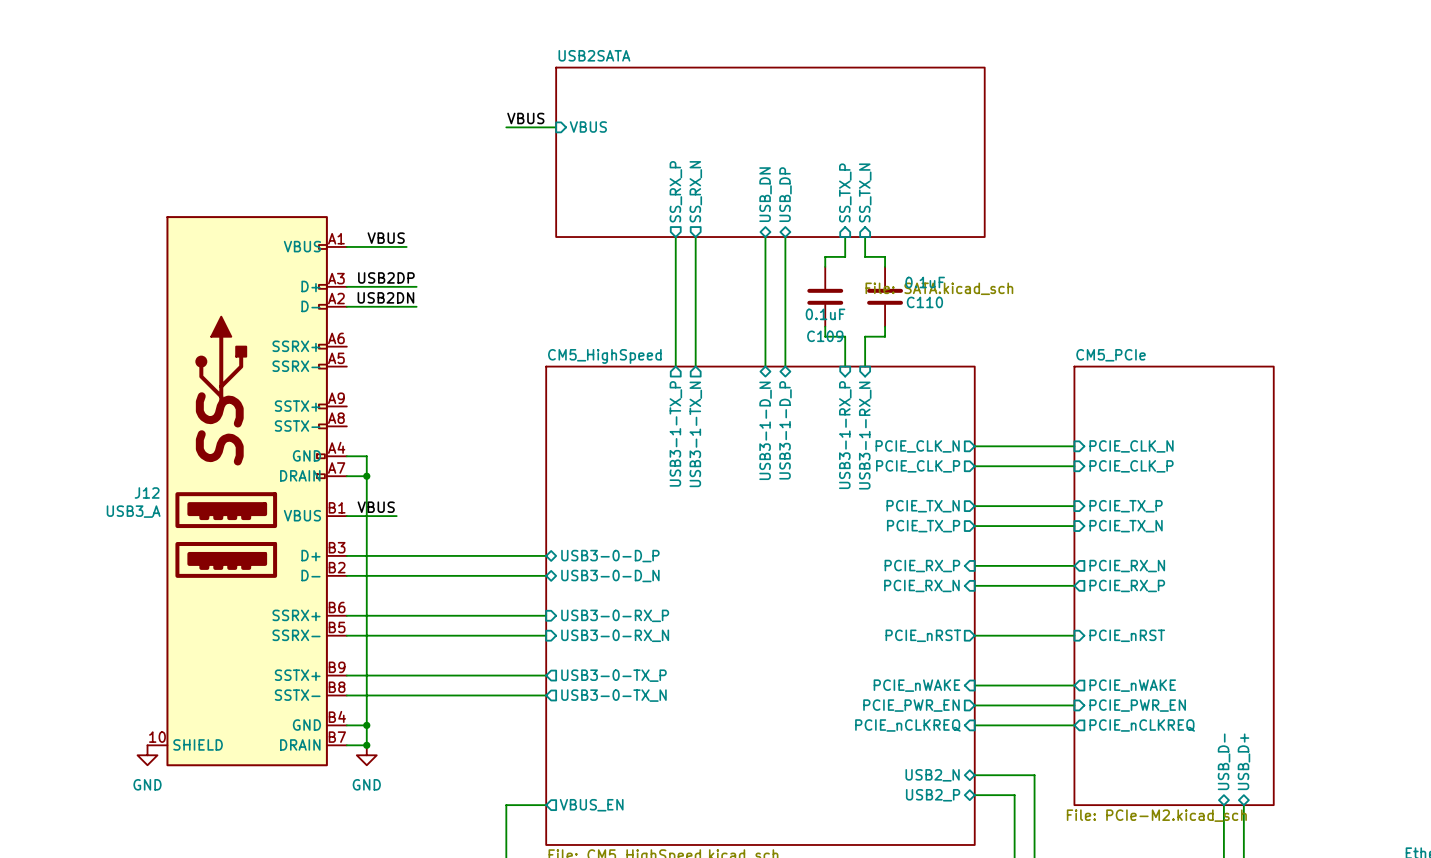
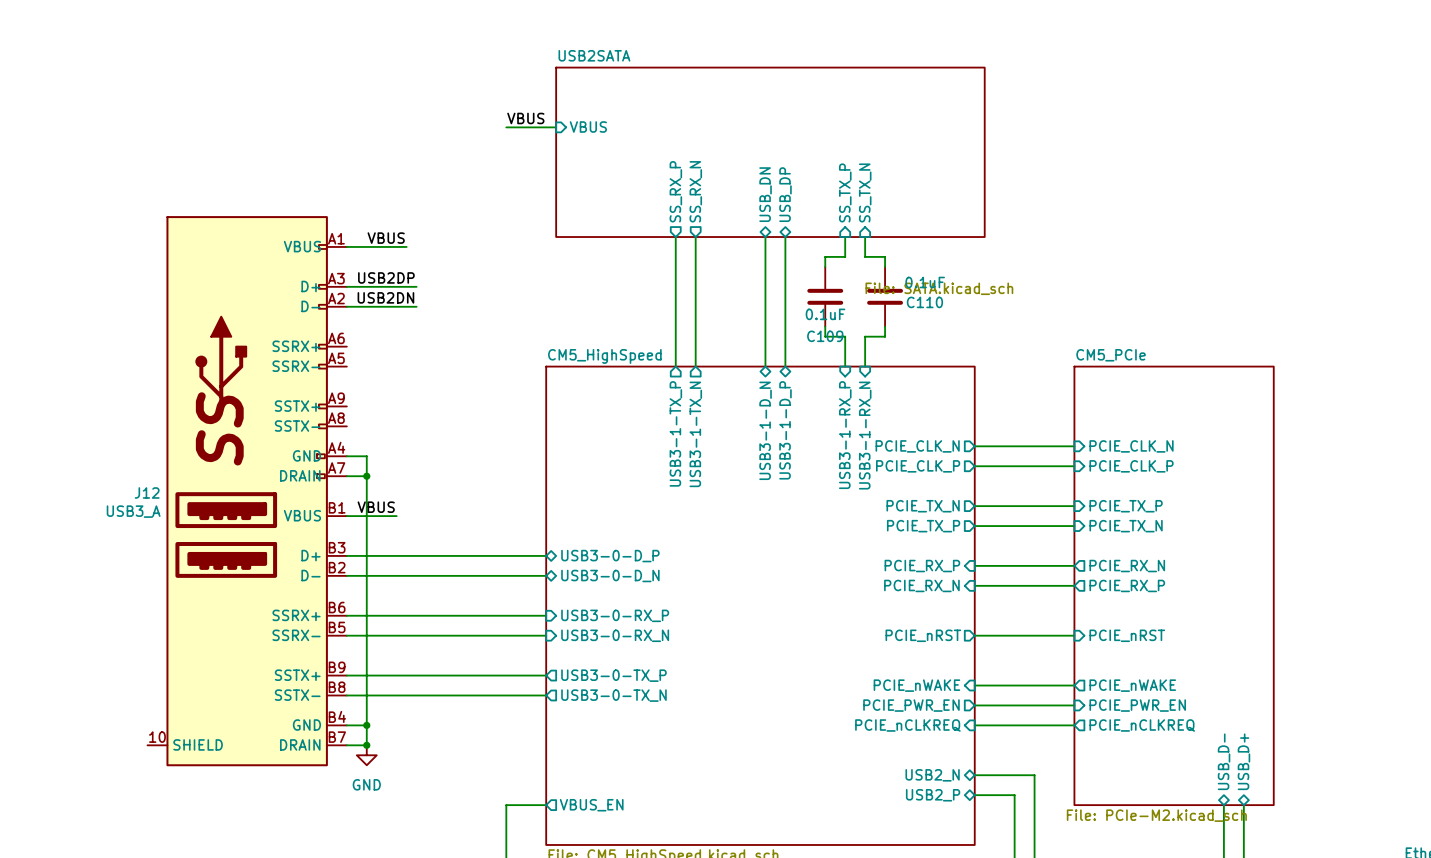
power symbol: GND (147, 755) -> none

